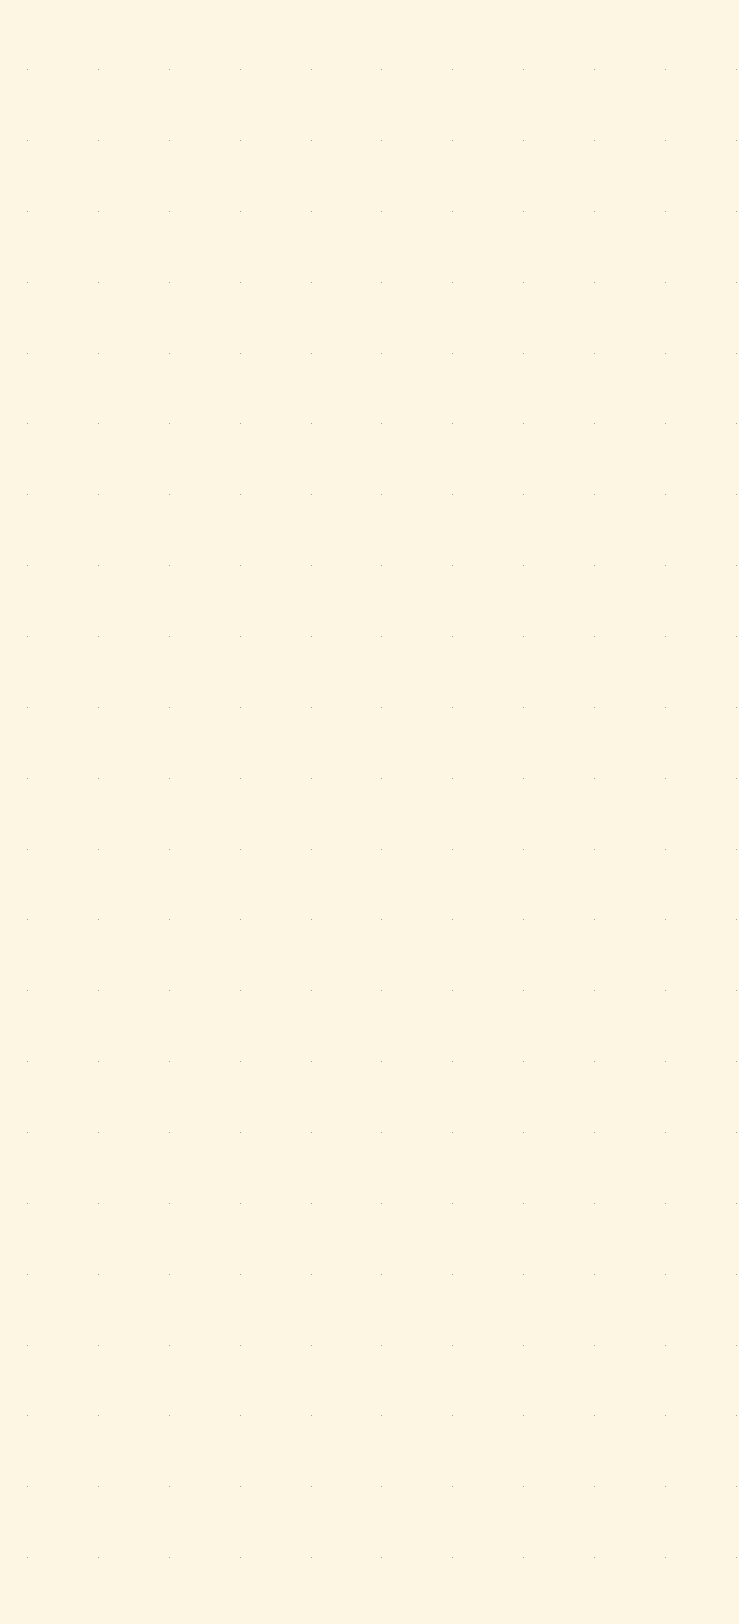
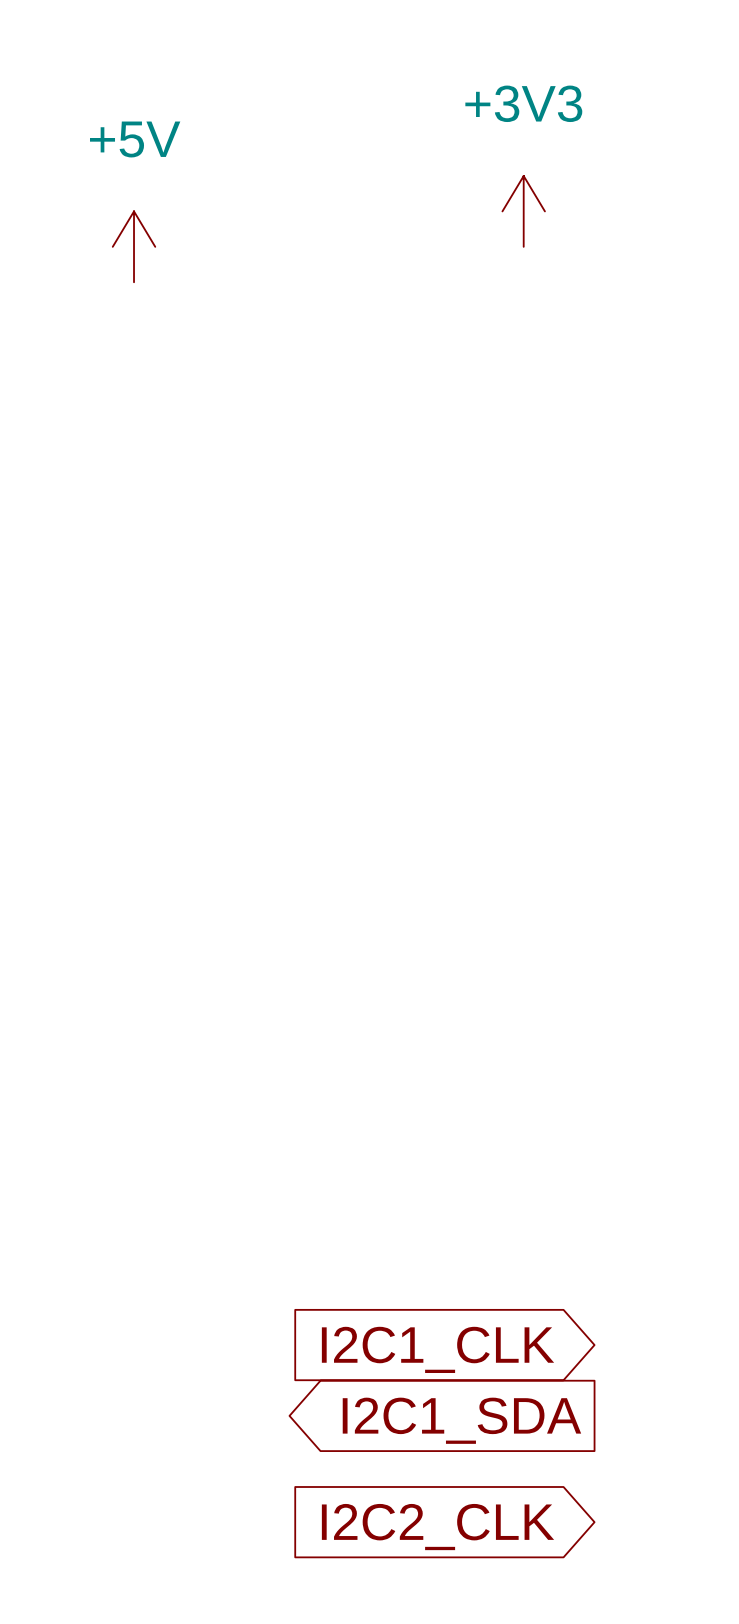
power symbol: none -> +3V3 (523, 211)
power symbol: none -> +5V (134, 246)
global label: none -> I2C1_CLK (437, 1349)
global label: none -> I2C1_SDA (461, 1420)
global label: none -> I2C2_CLK (437, 1527)

